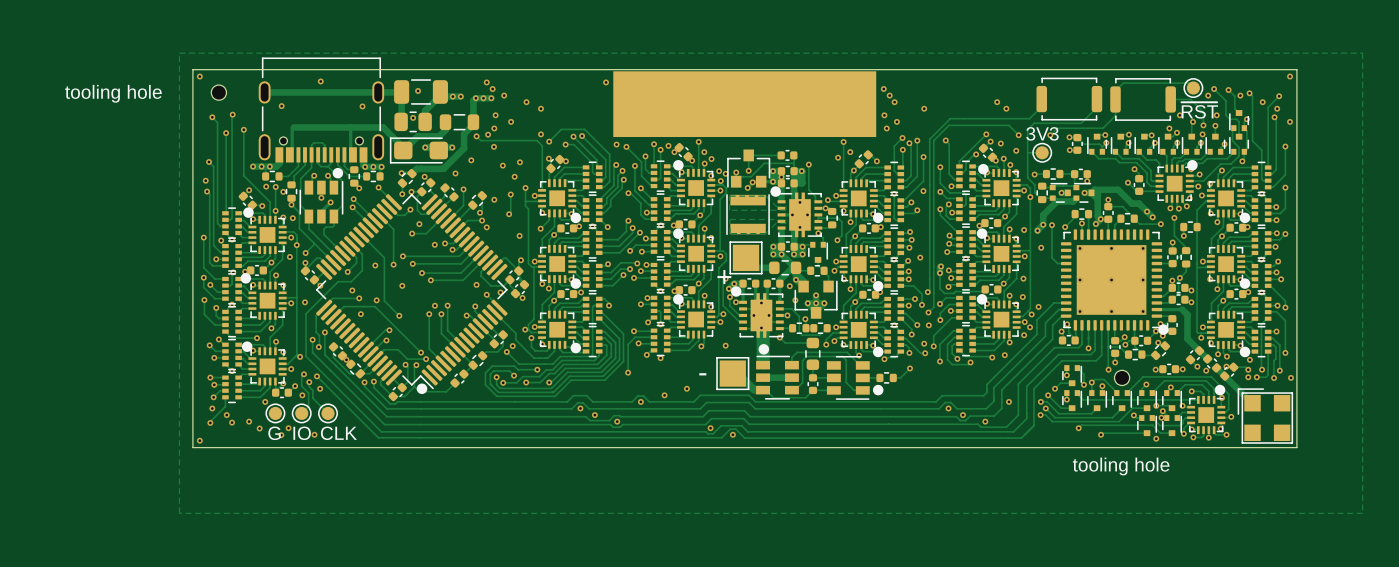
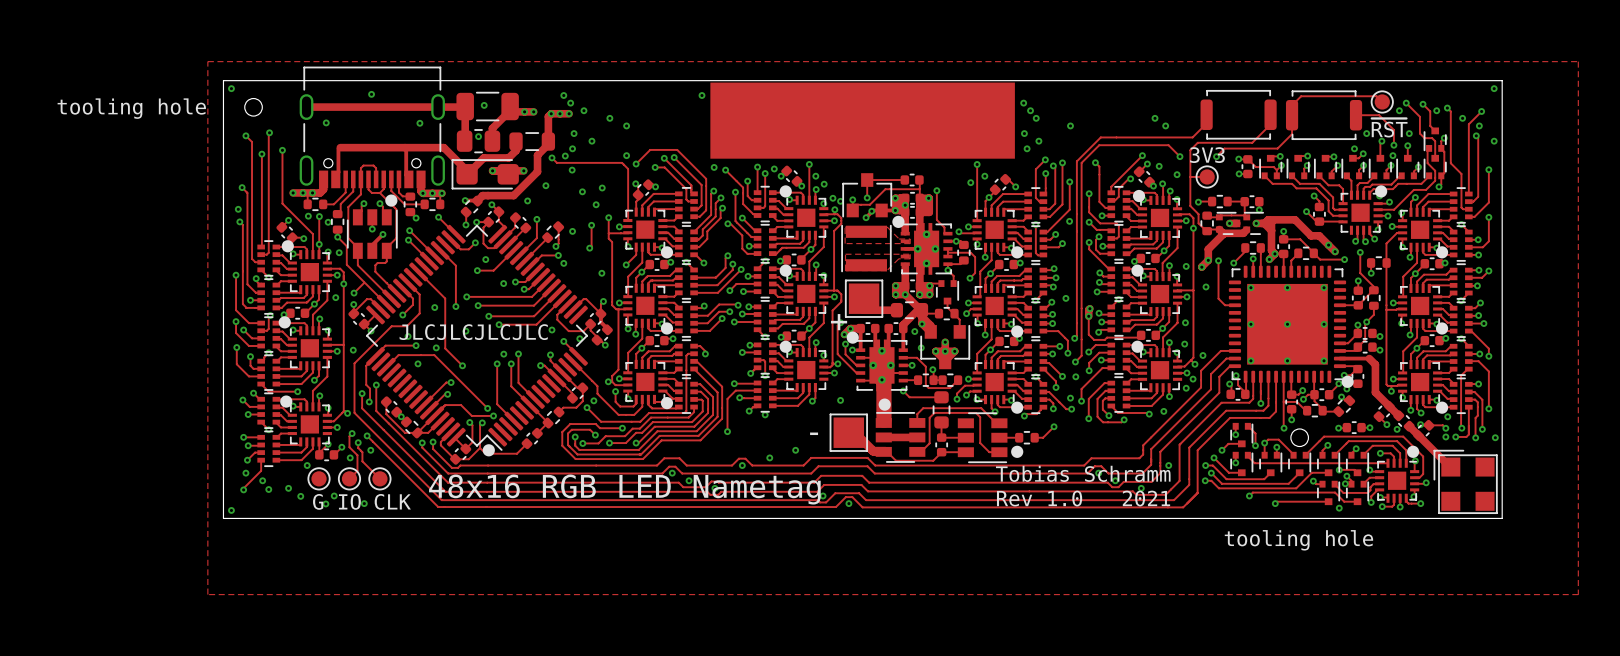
text: none -> JLCJLCJLCJLC (473, 332)
text: none -> Tobias Schramm (1083, 473)
text: none -> 48x16 RGB LED Nametag (624, 489)
text: none -> Rev 1.0 2021 (1083, 498)

